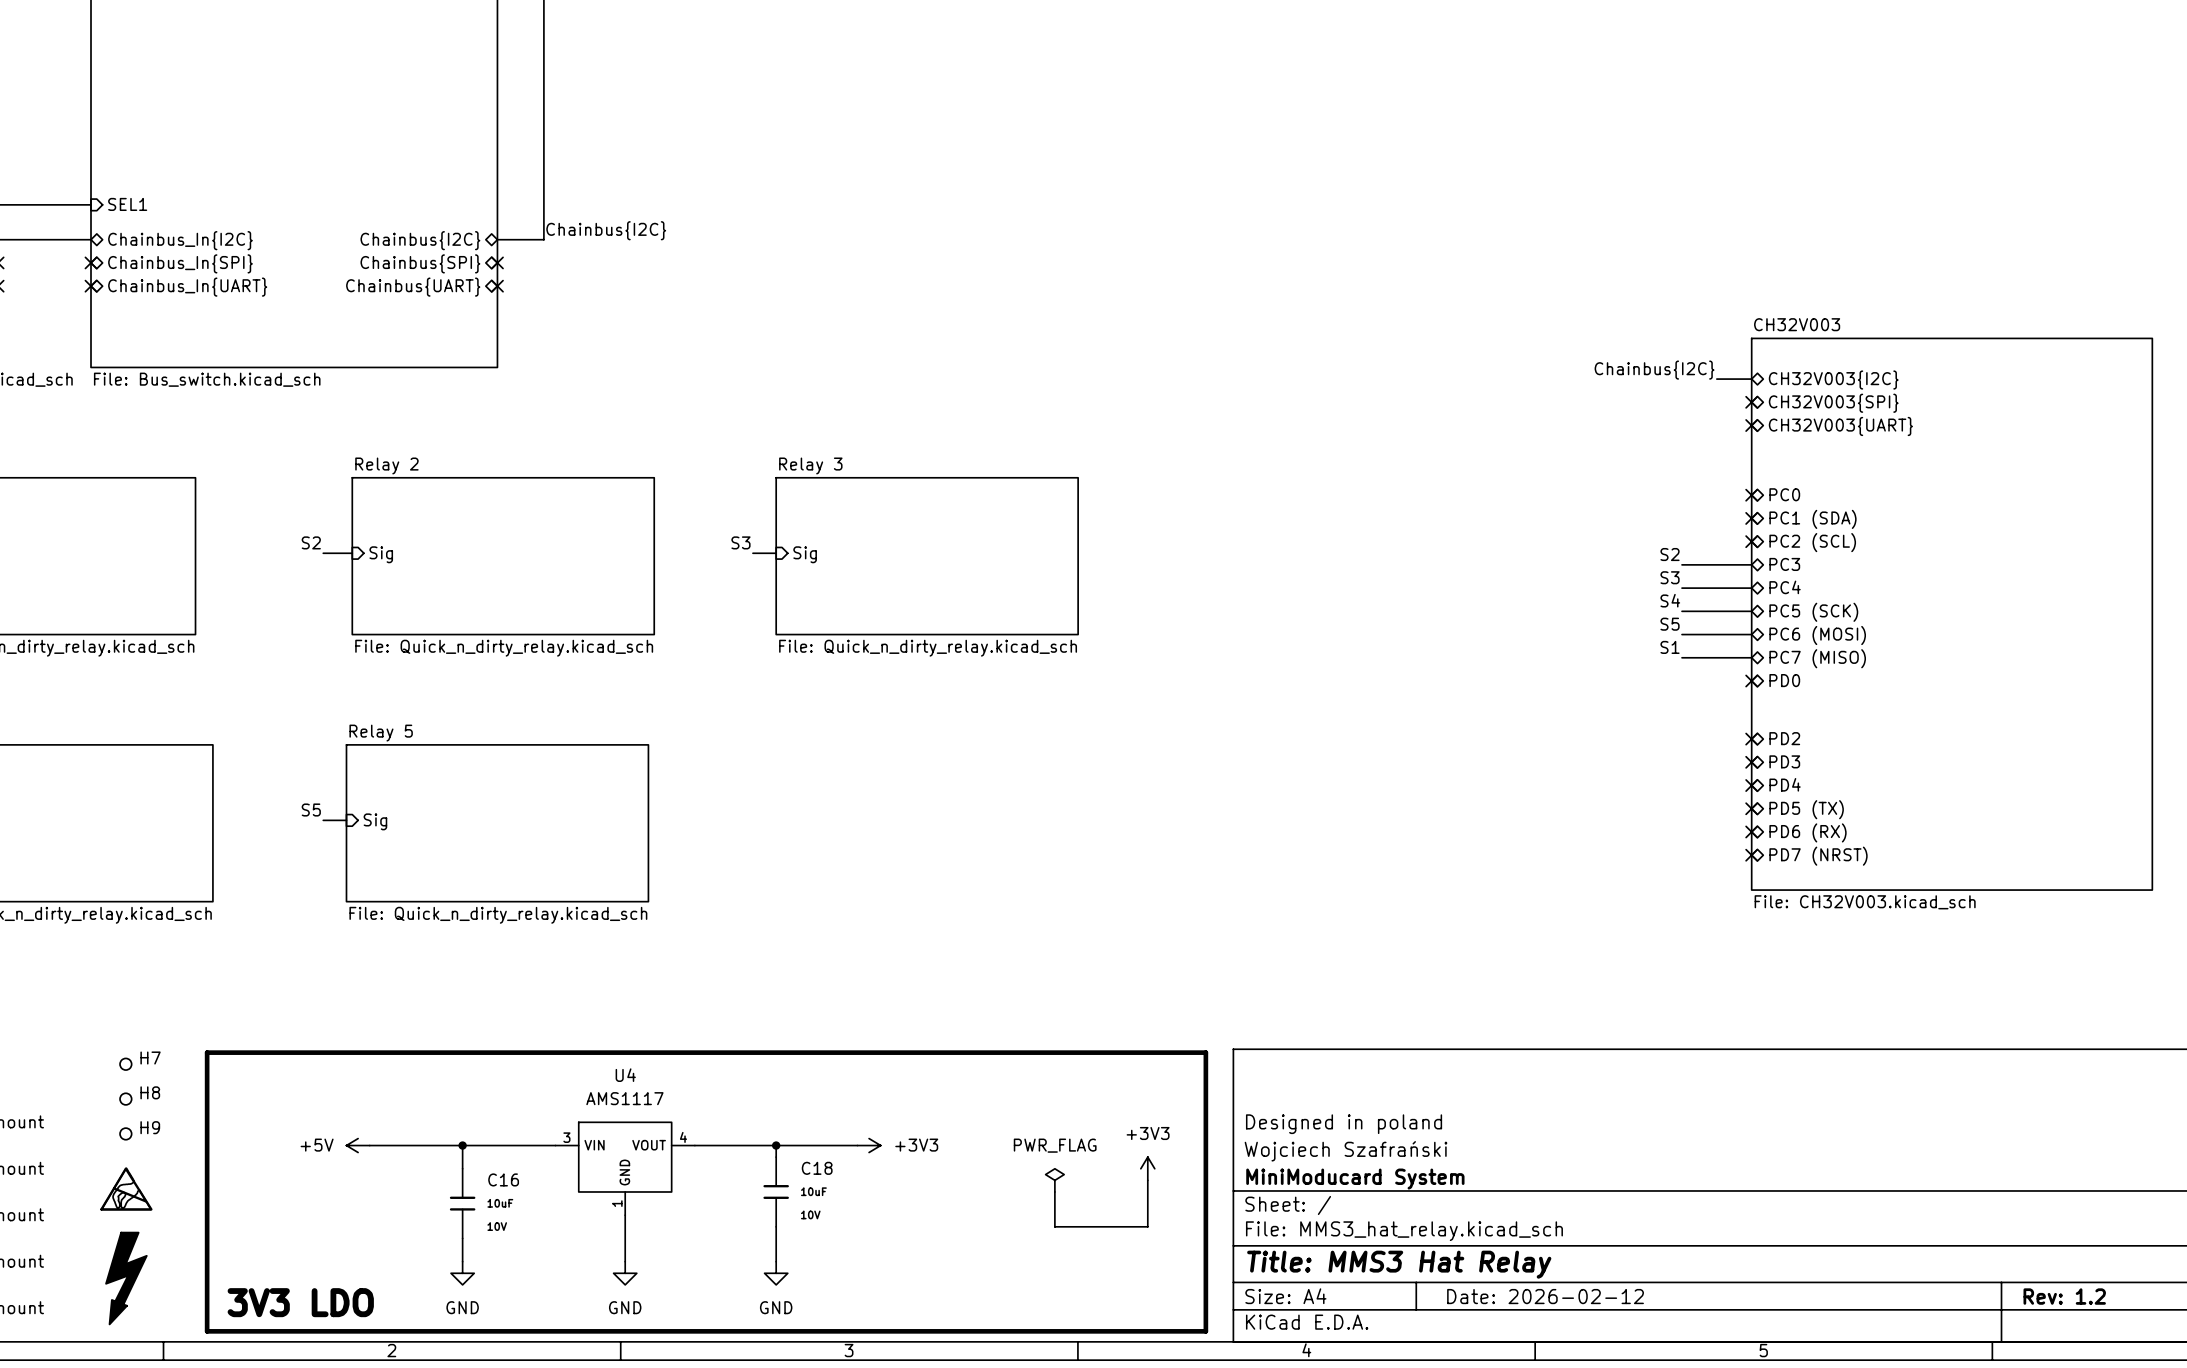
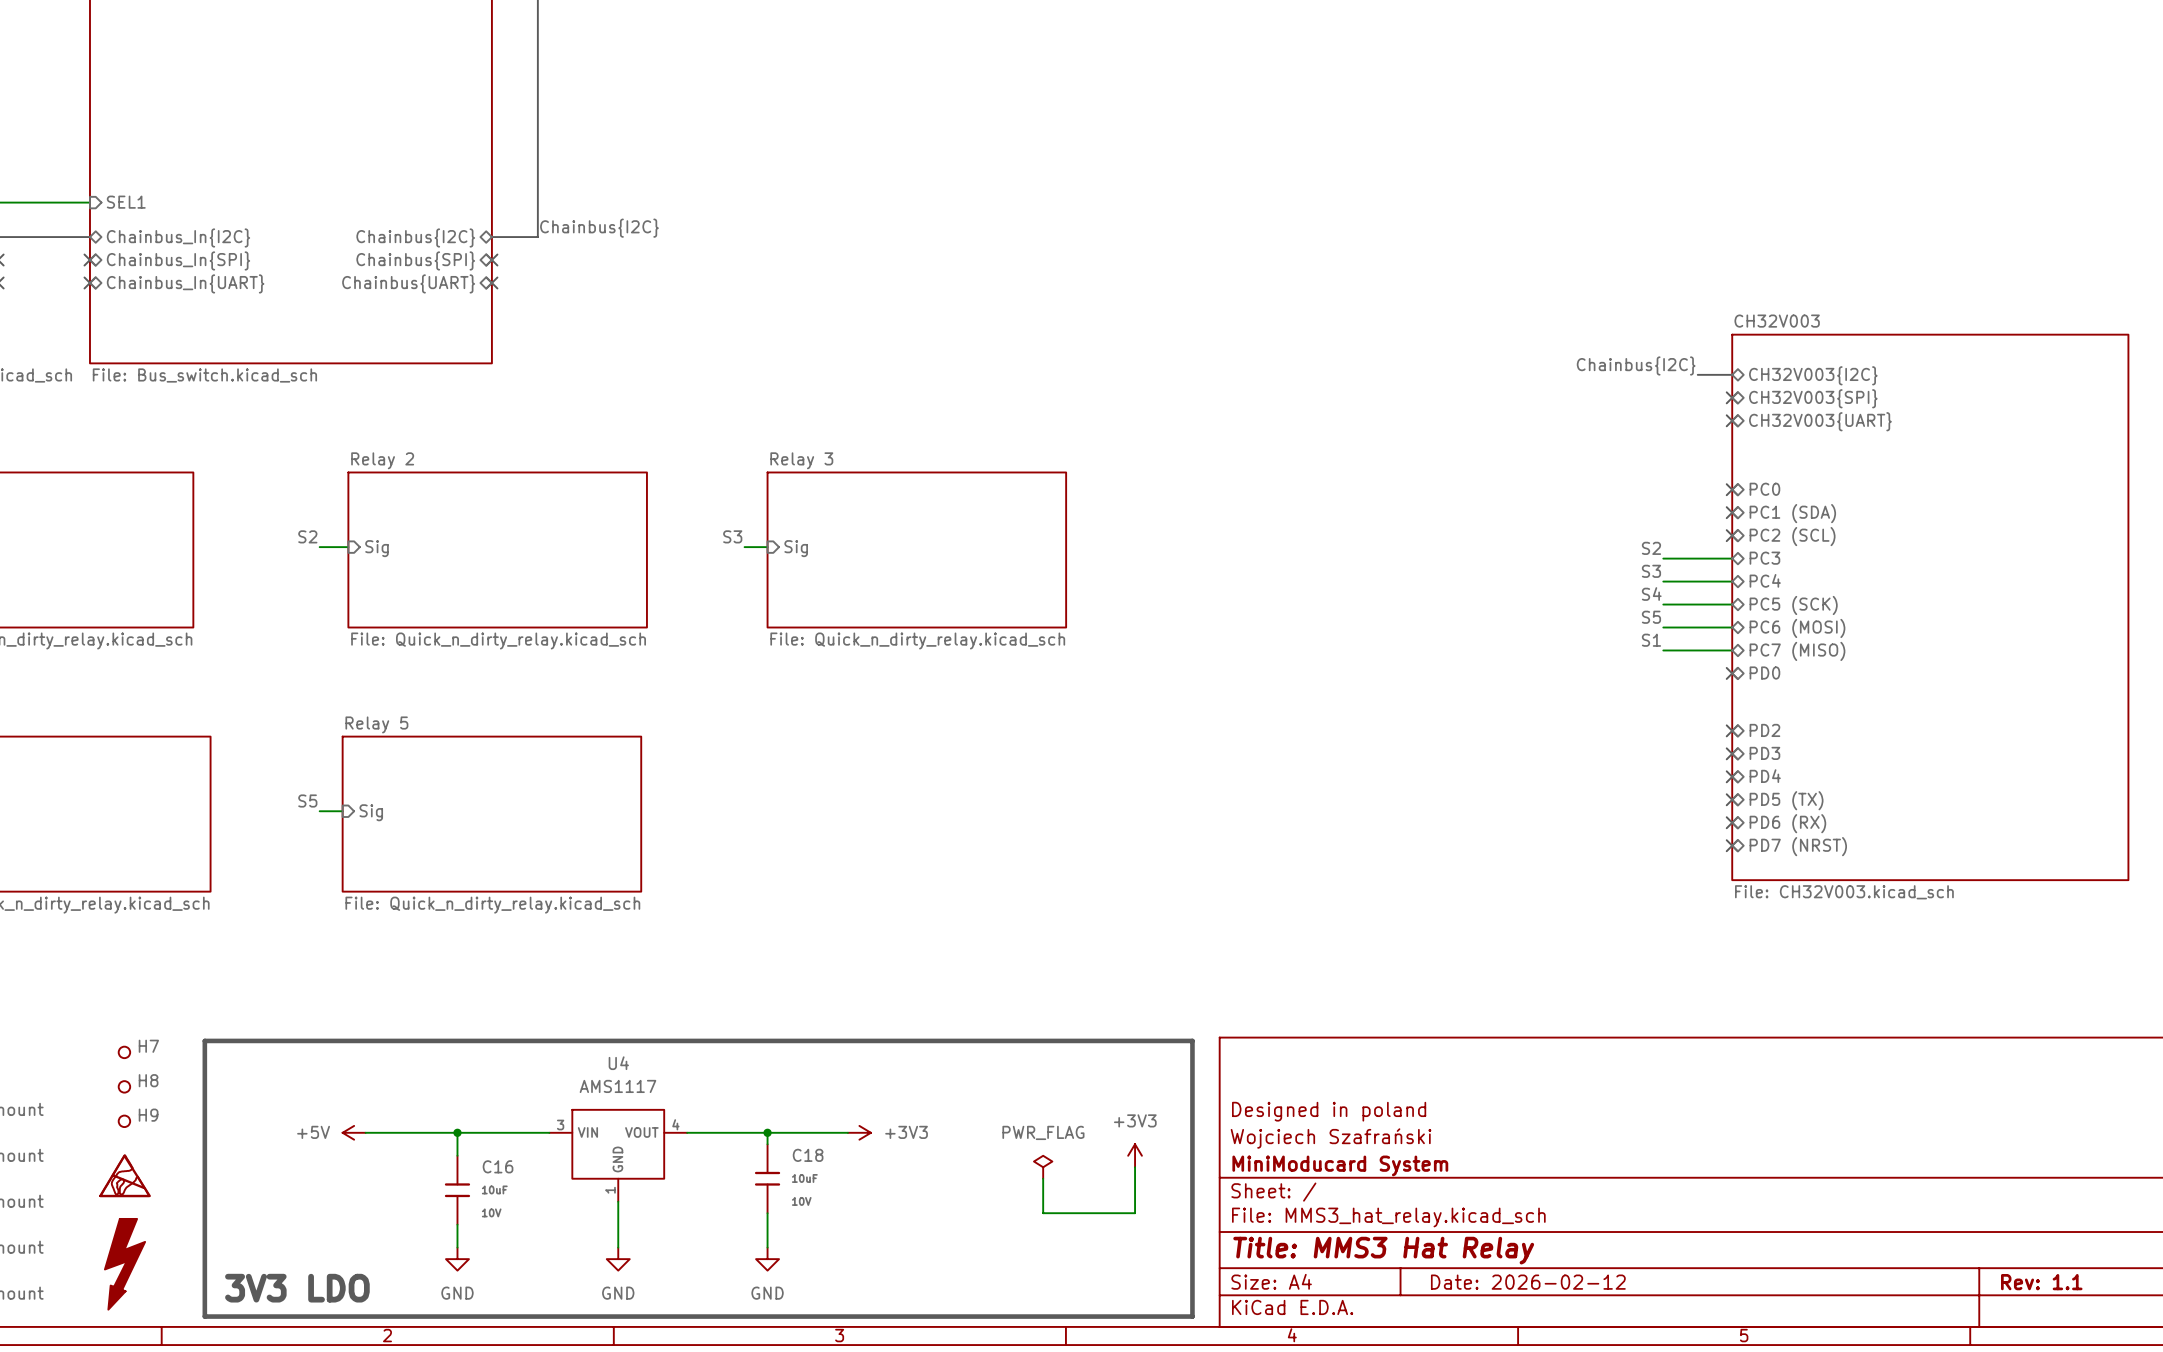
title block: Rev: 1.2 (2064, 1296) -> Rev: 1.1 (2041, 1282)

